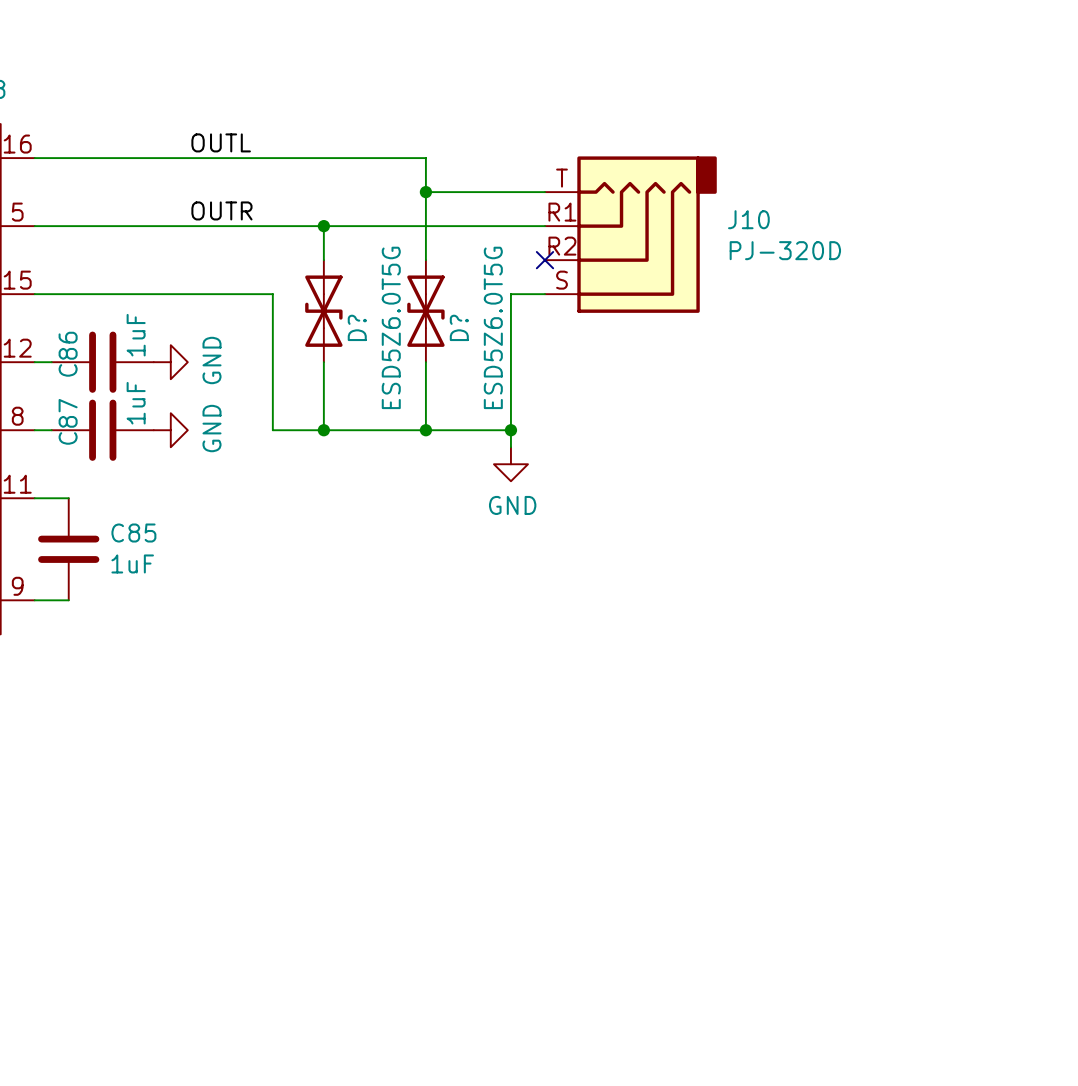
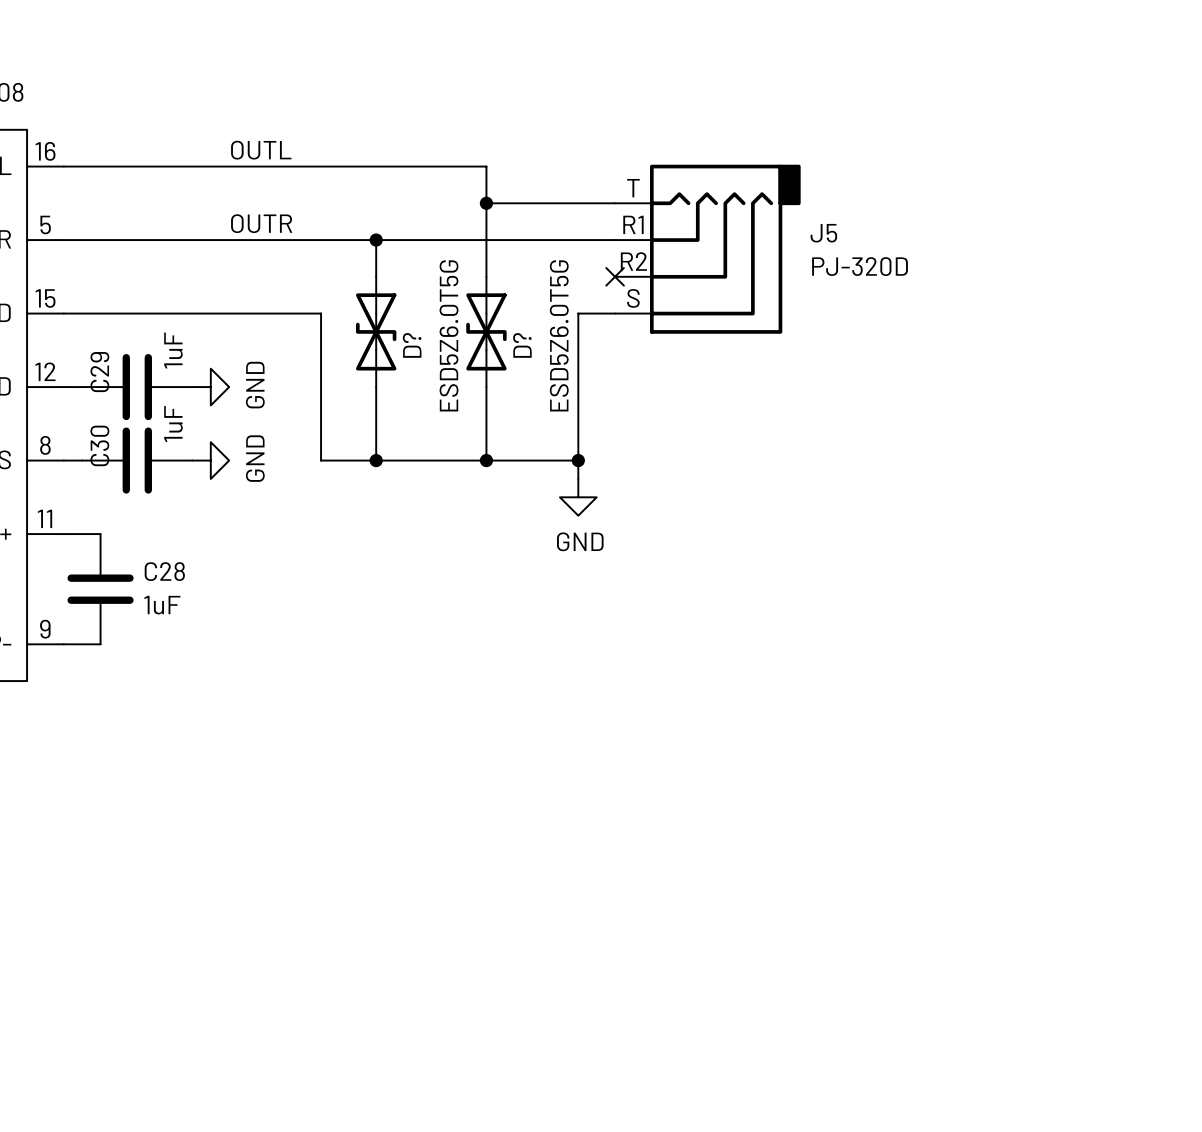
J10 name: J10 (748, 219) -> J5 (823, 233)
C86 name: C86 (68, 354) -> C29 (99, 372)
C87 name: C87 (68, 421) -> C30 (99, 445)
C85 name: C85 (133, 533) -> C28 (164, 571)

